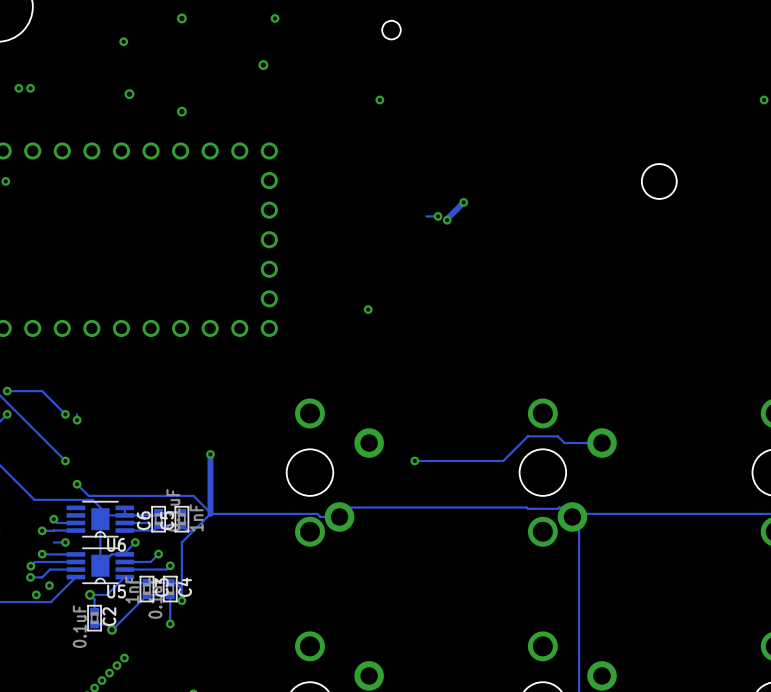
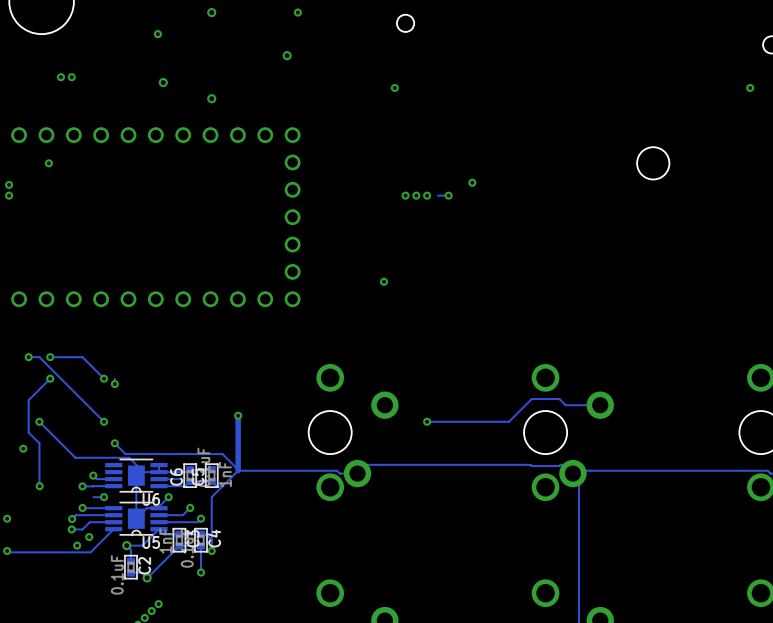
track: (463, 202) (447, 220) -> none
via: none -> (405, 195)
via: none -> (416, 195)
via: none -> (427, 195)
via: (447, 220) -> none

